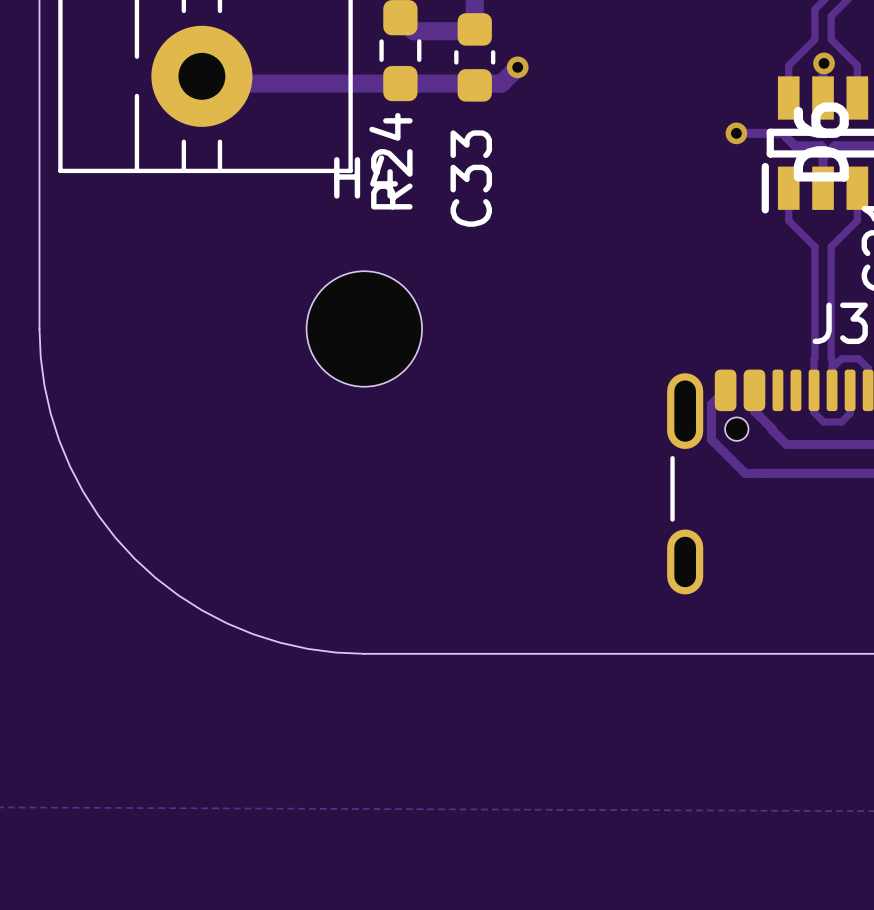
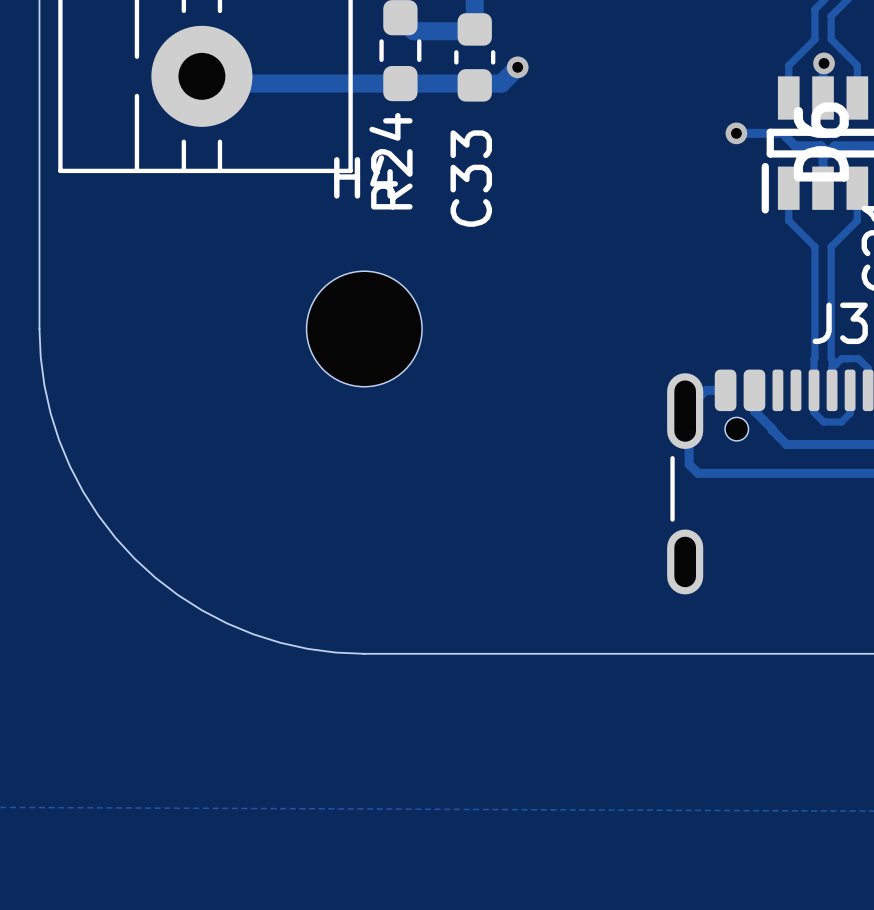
track: (725, 390) (711, 404) (711, 439) (745, 473) -> (725, 390) (705, 390) (684, 412) (689, 417) (689, 464) (698, 473) (745, 473)

